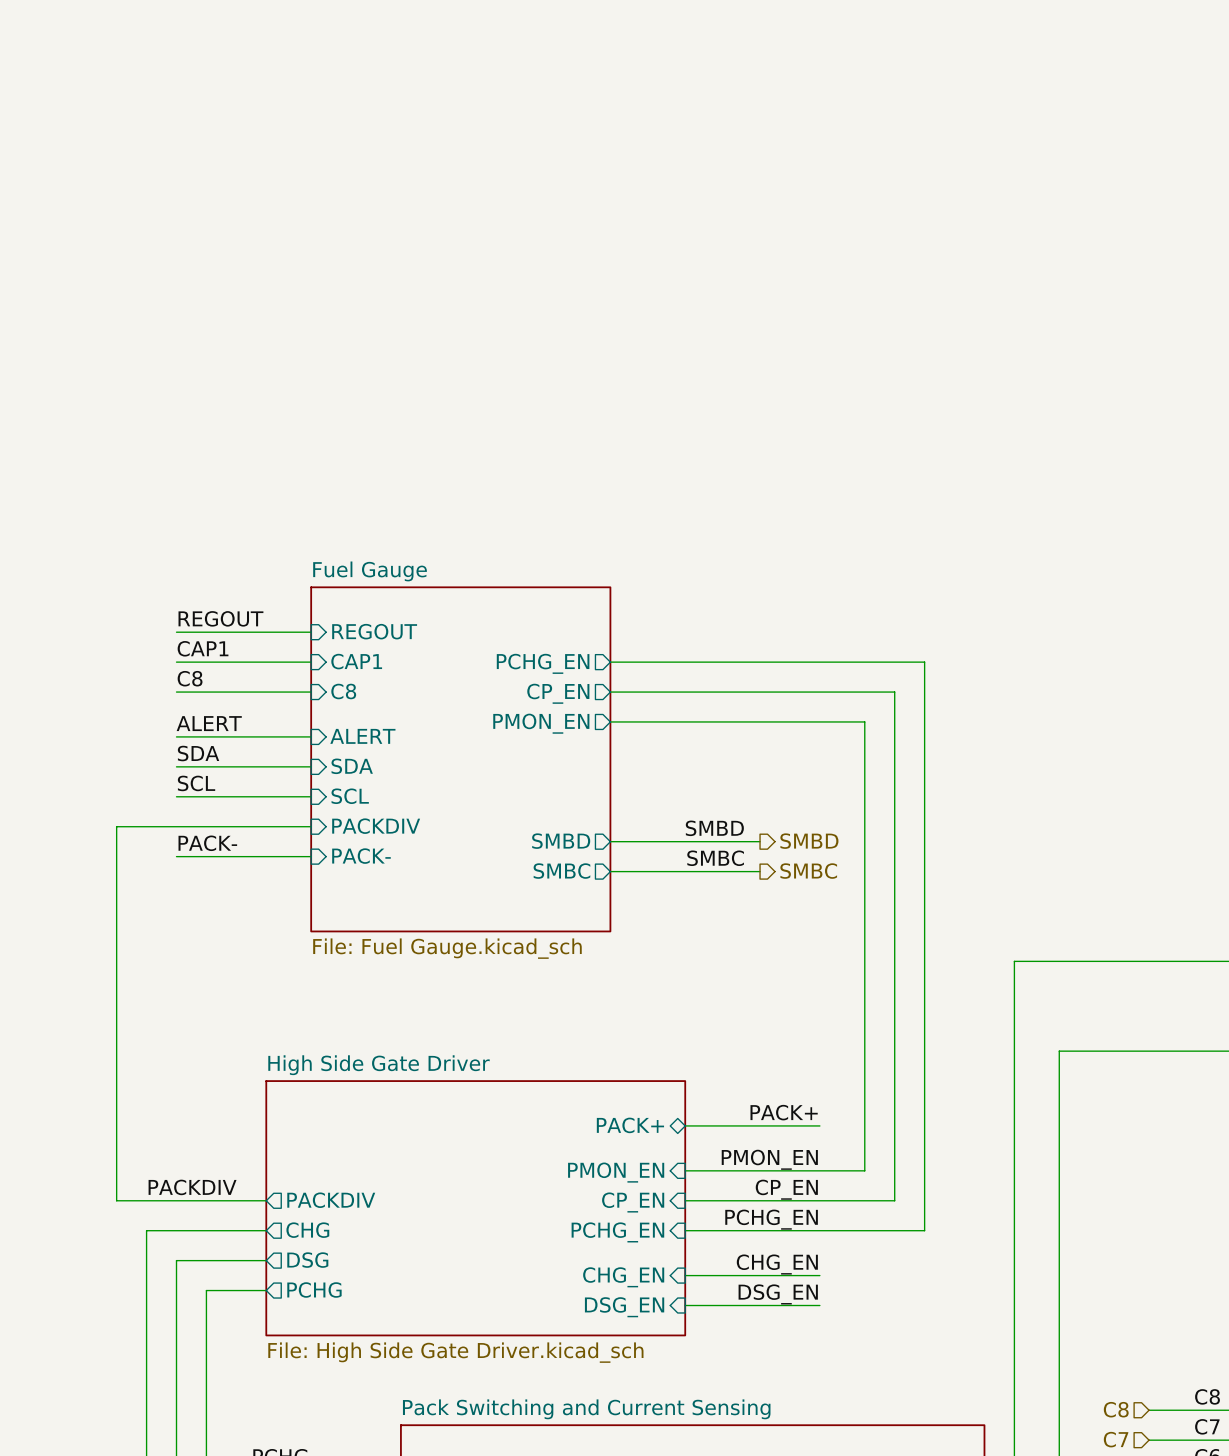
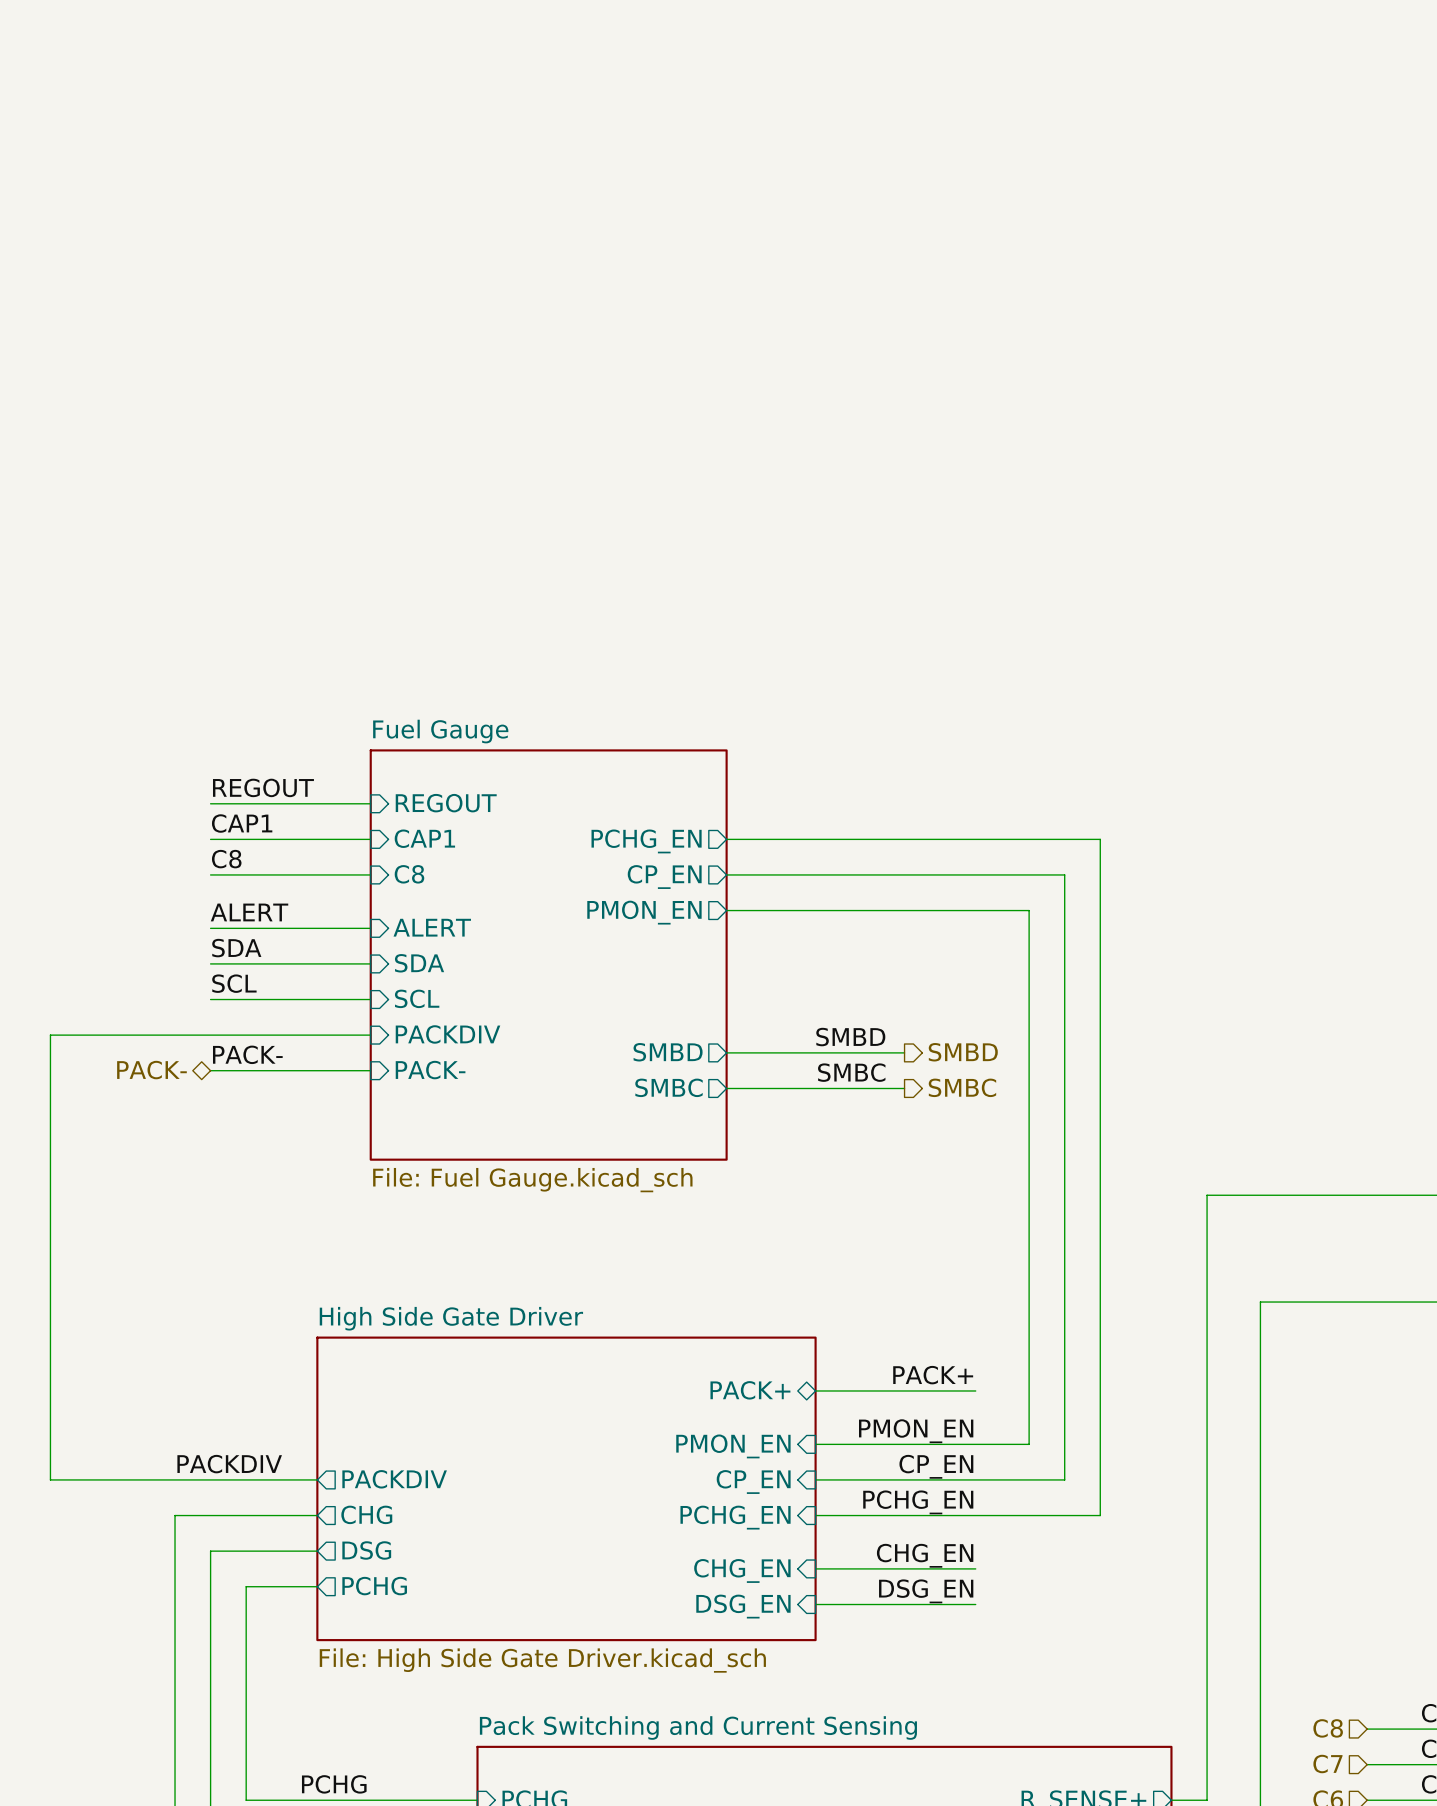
wire: (116, 826) (116, 1200) -> (139, 1035) (50, 1035) (50, 1479) (139, 1479)
hierarchical label: none -> PACK- (151, 1070)

